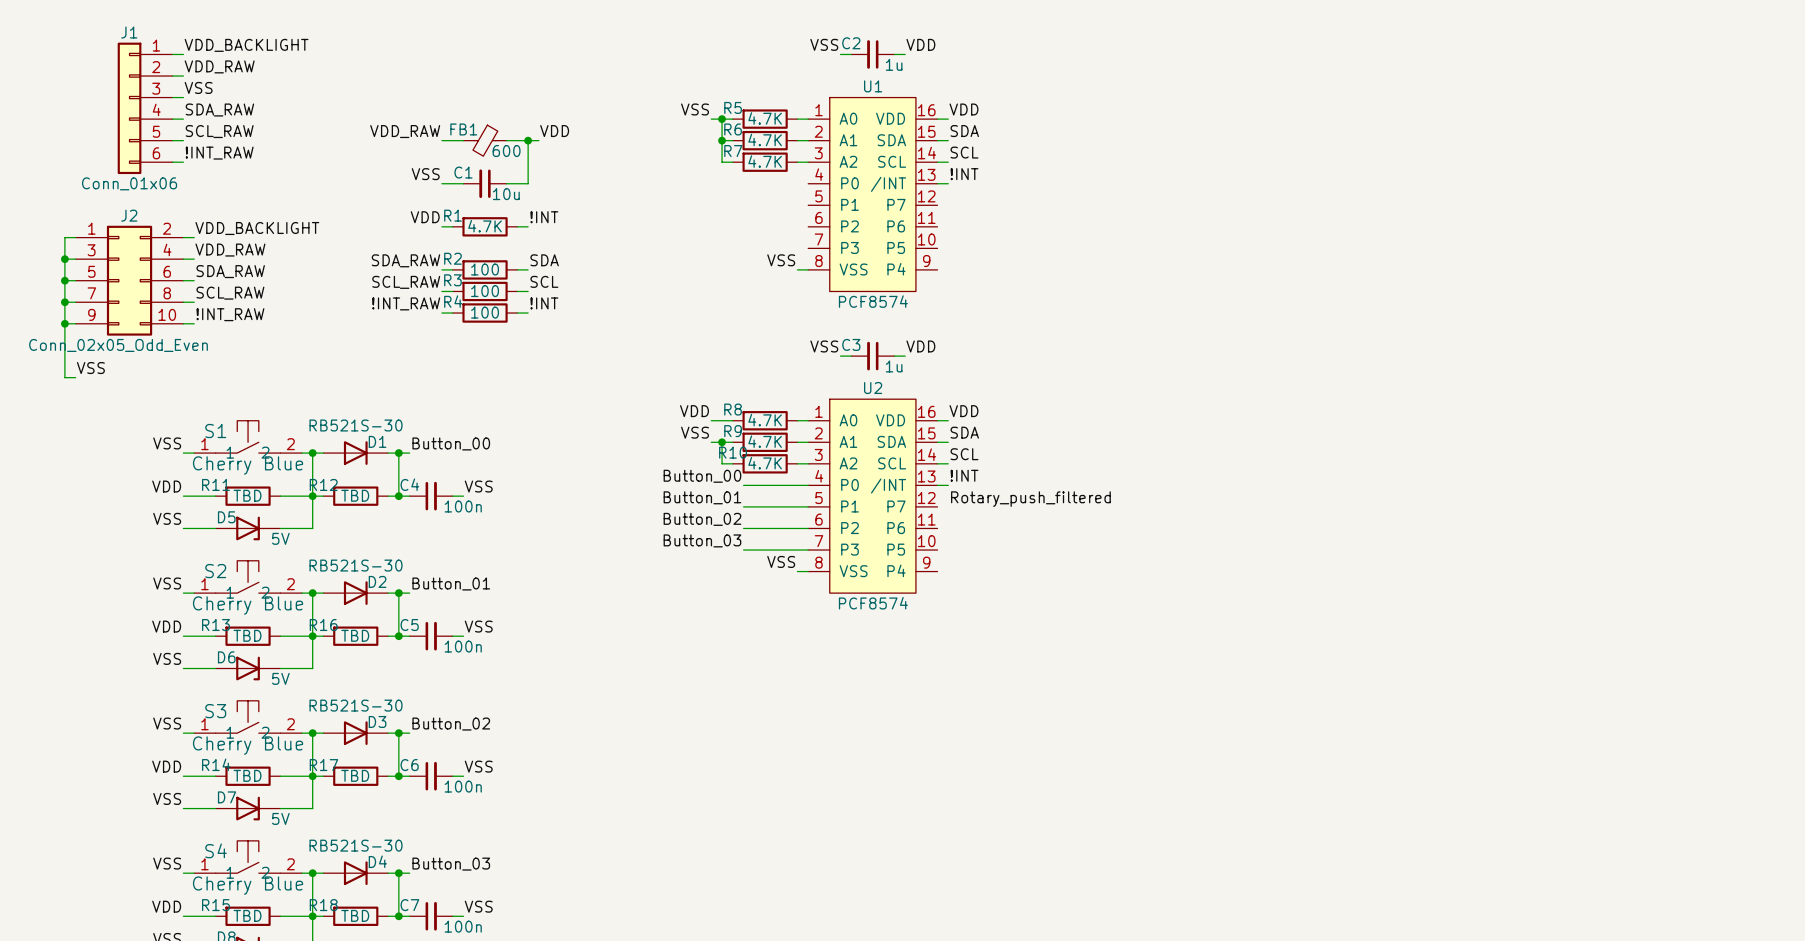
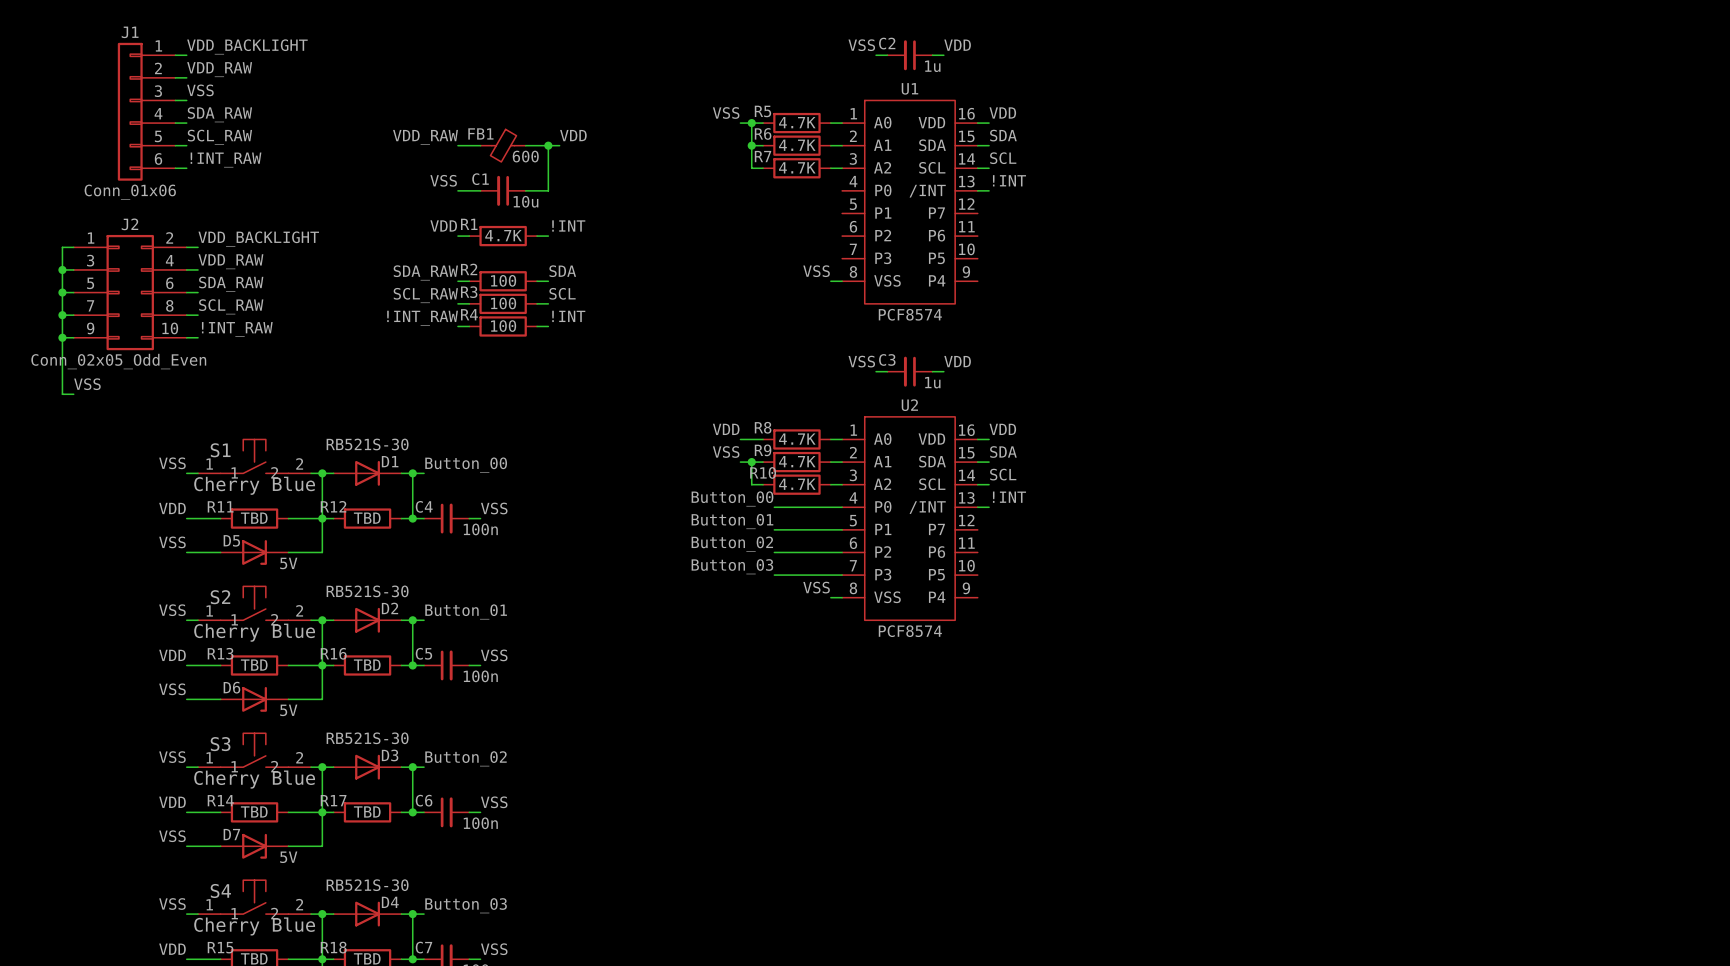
label: Rotary_push_filtered (1030, 499) -> none

